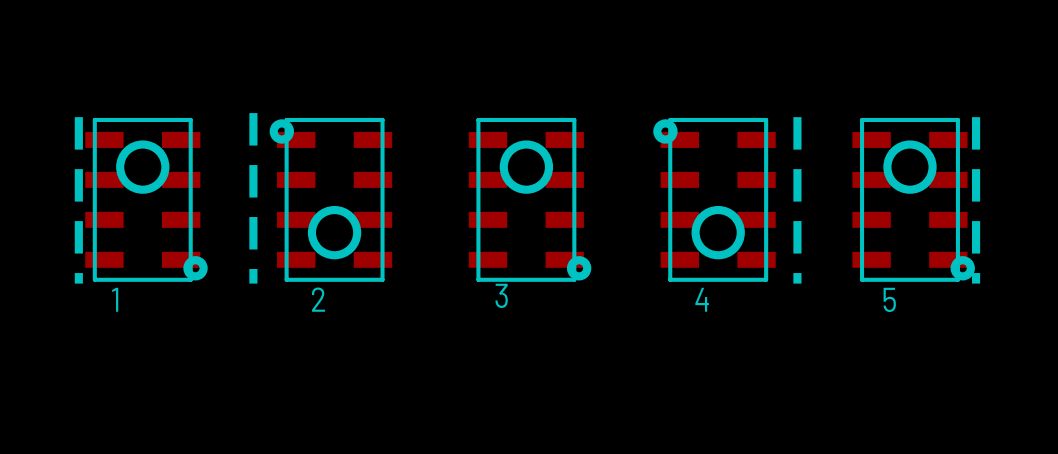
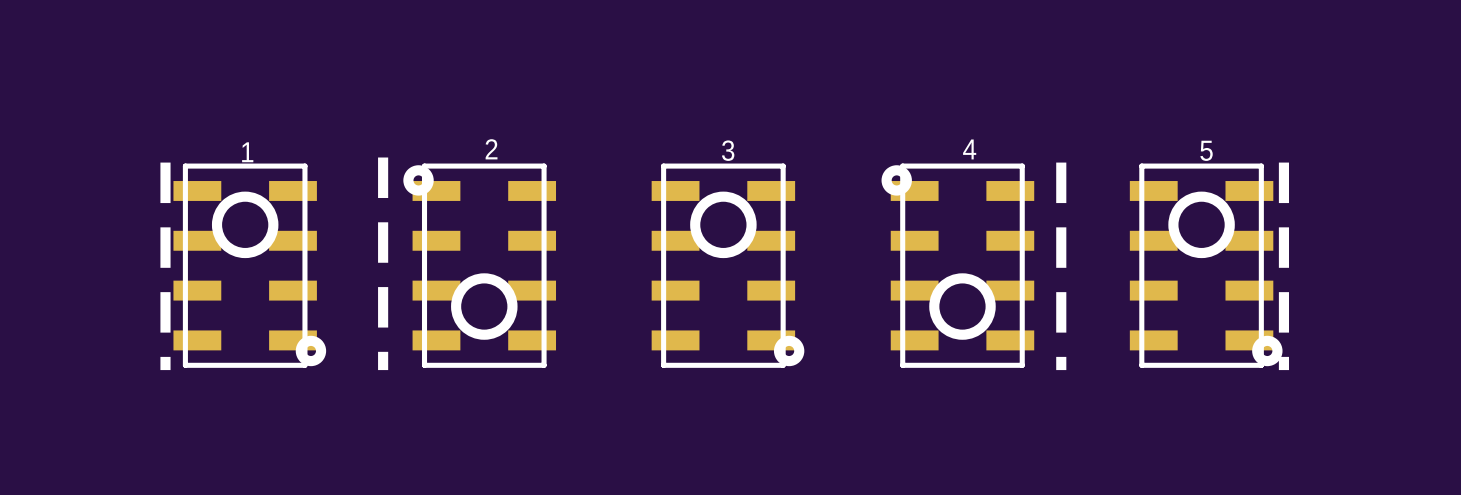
3 name position: 3 (501, 295) -> 3 (728, 150)
1 name position: 1 (115, 299) -> 1 (247, 152)
2 name position: 2 (318, 299) -> 2 (491, 149)
4 name position: 4 (702, 299) -> 4 (969, 149)
5 name position: 5 (889, 299) -> 5 (1206, 150)

